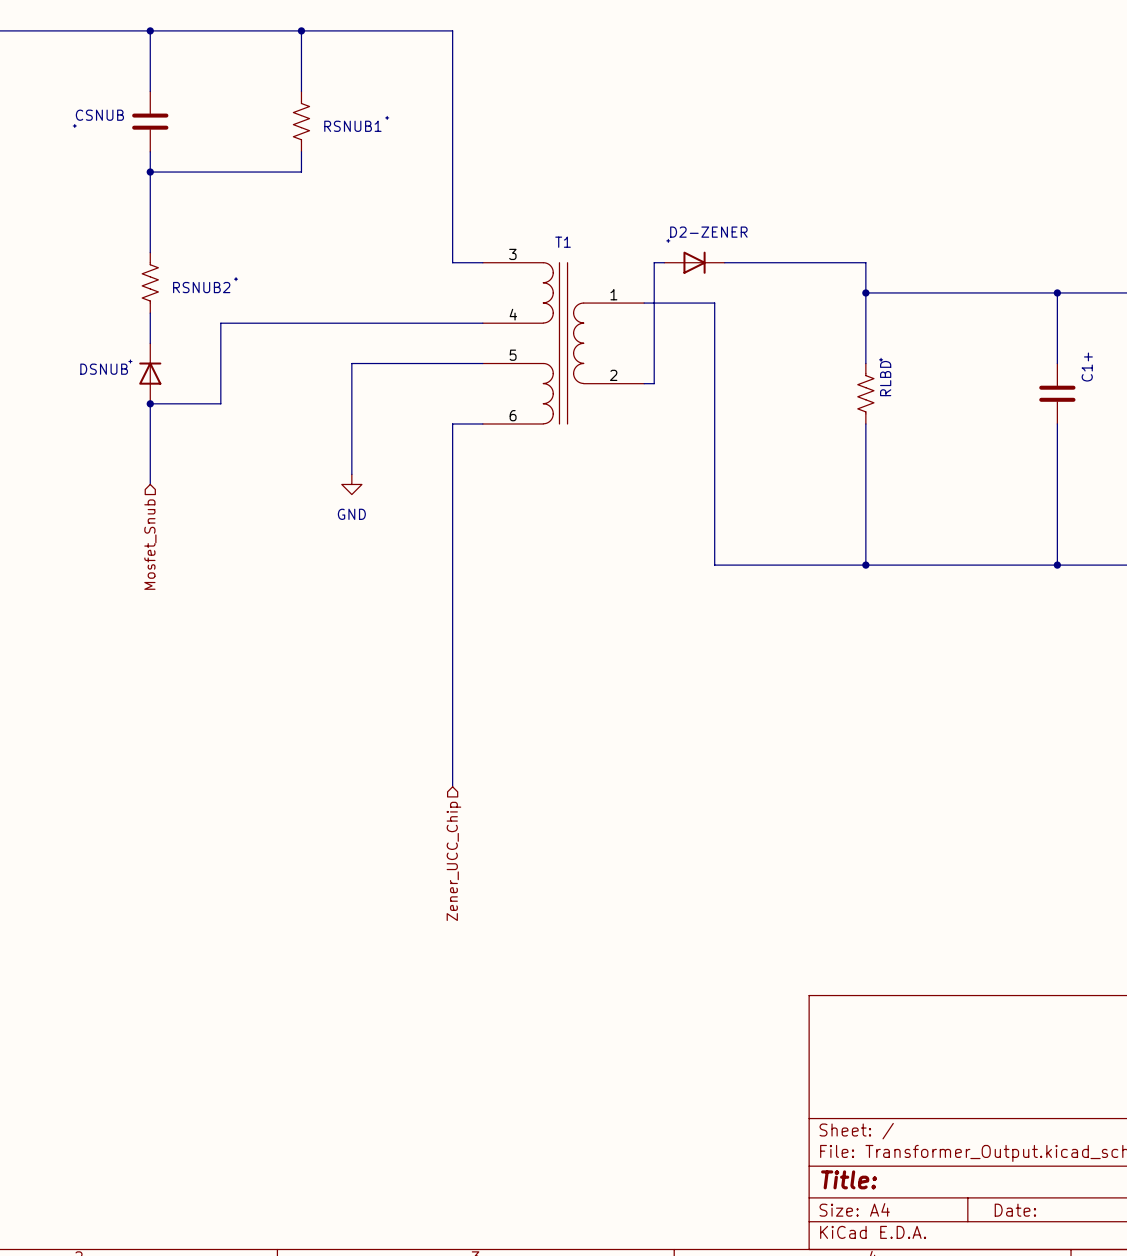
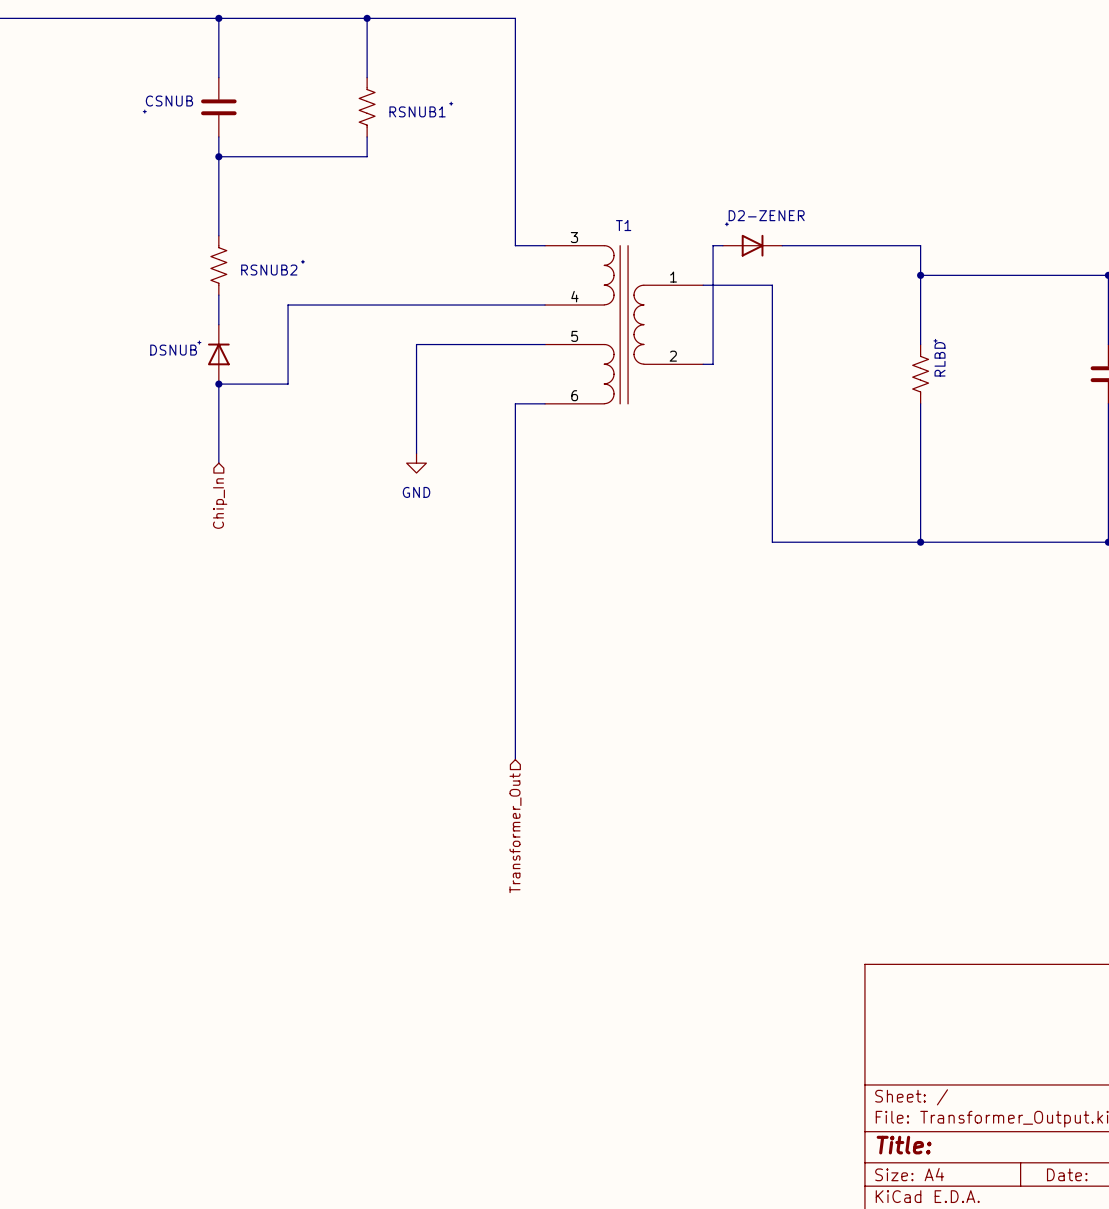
hierarchical label: Mosfet_Snub (150, 544) -> Chip_In (220, 503)
hierarchical label: Zener_UCC_Chip (453, 861) -> Transformer_Out (515, 833)

